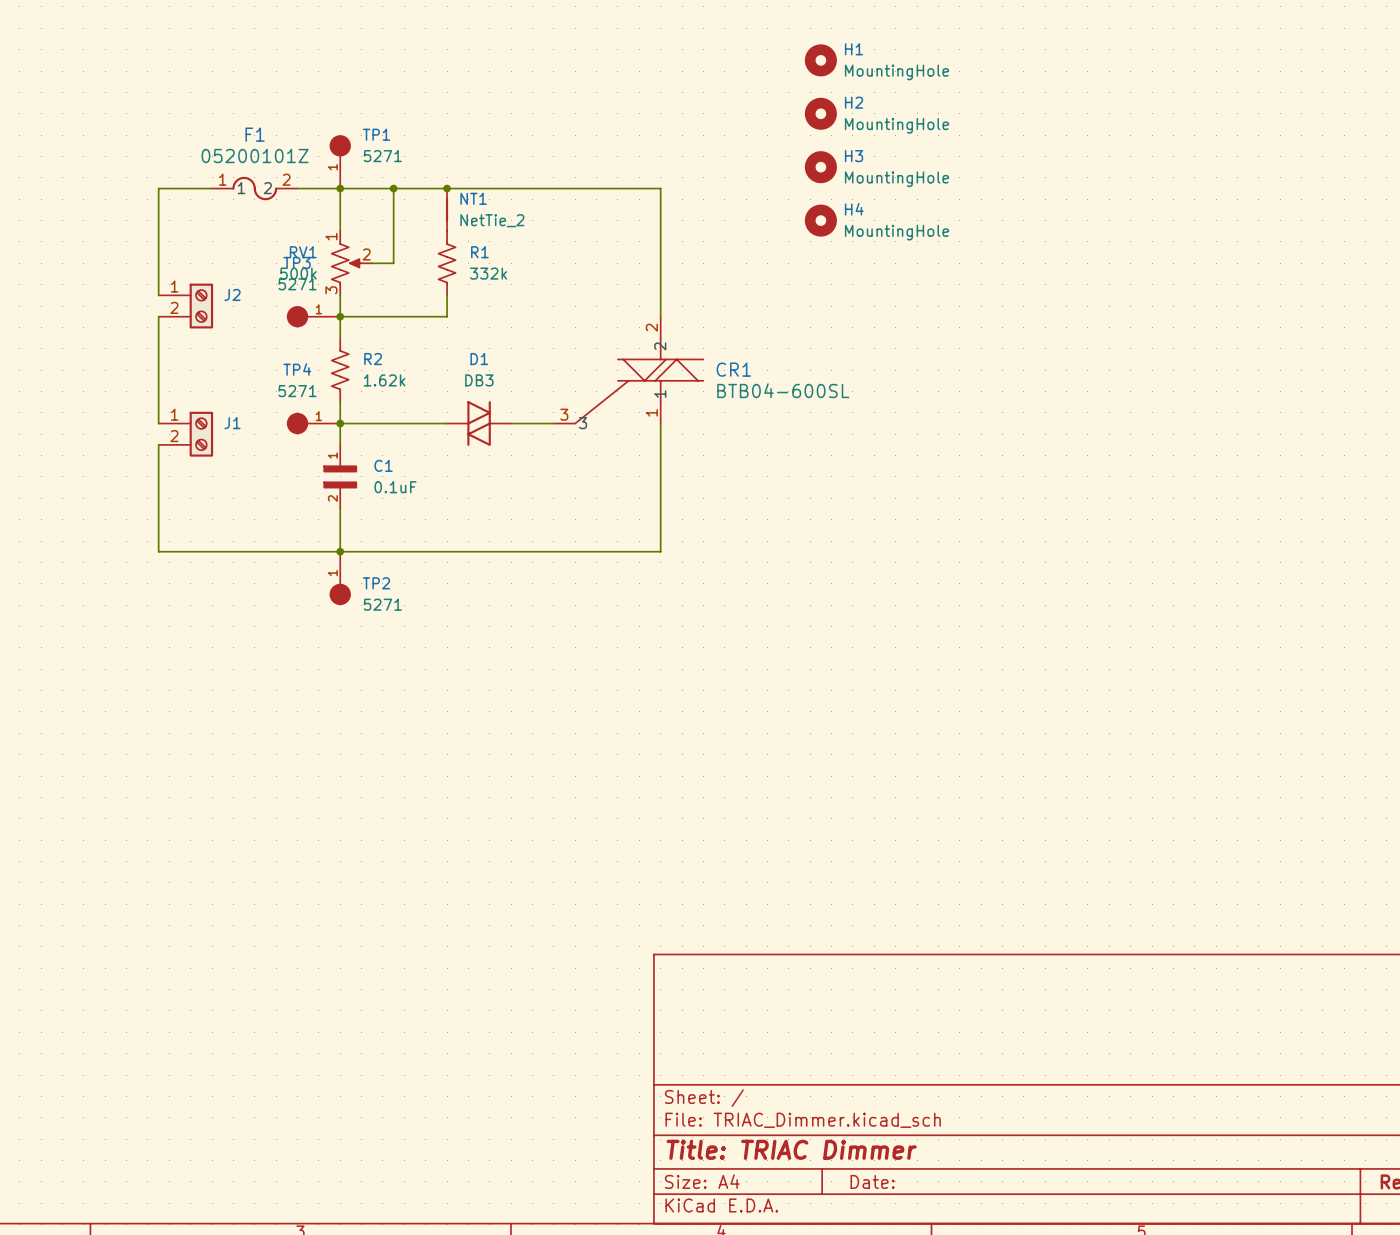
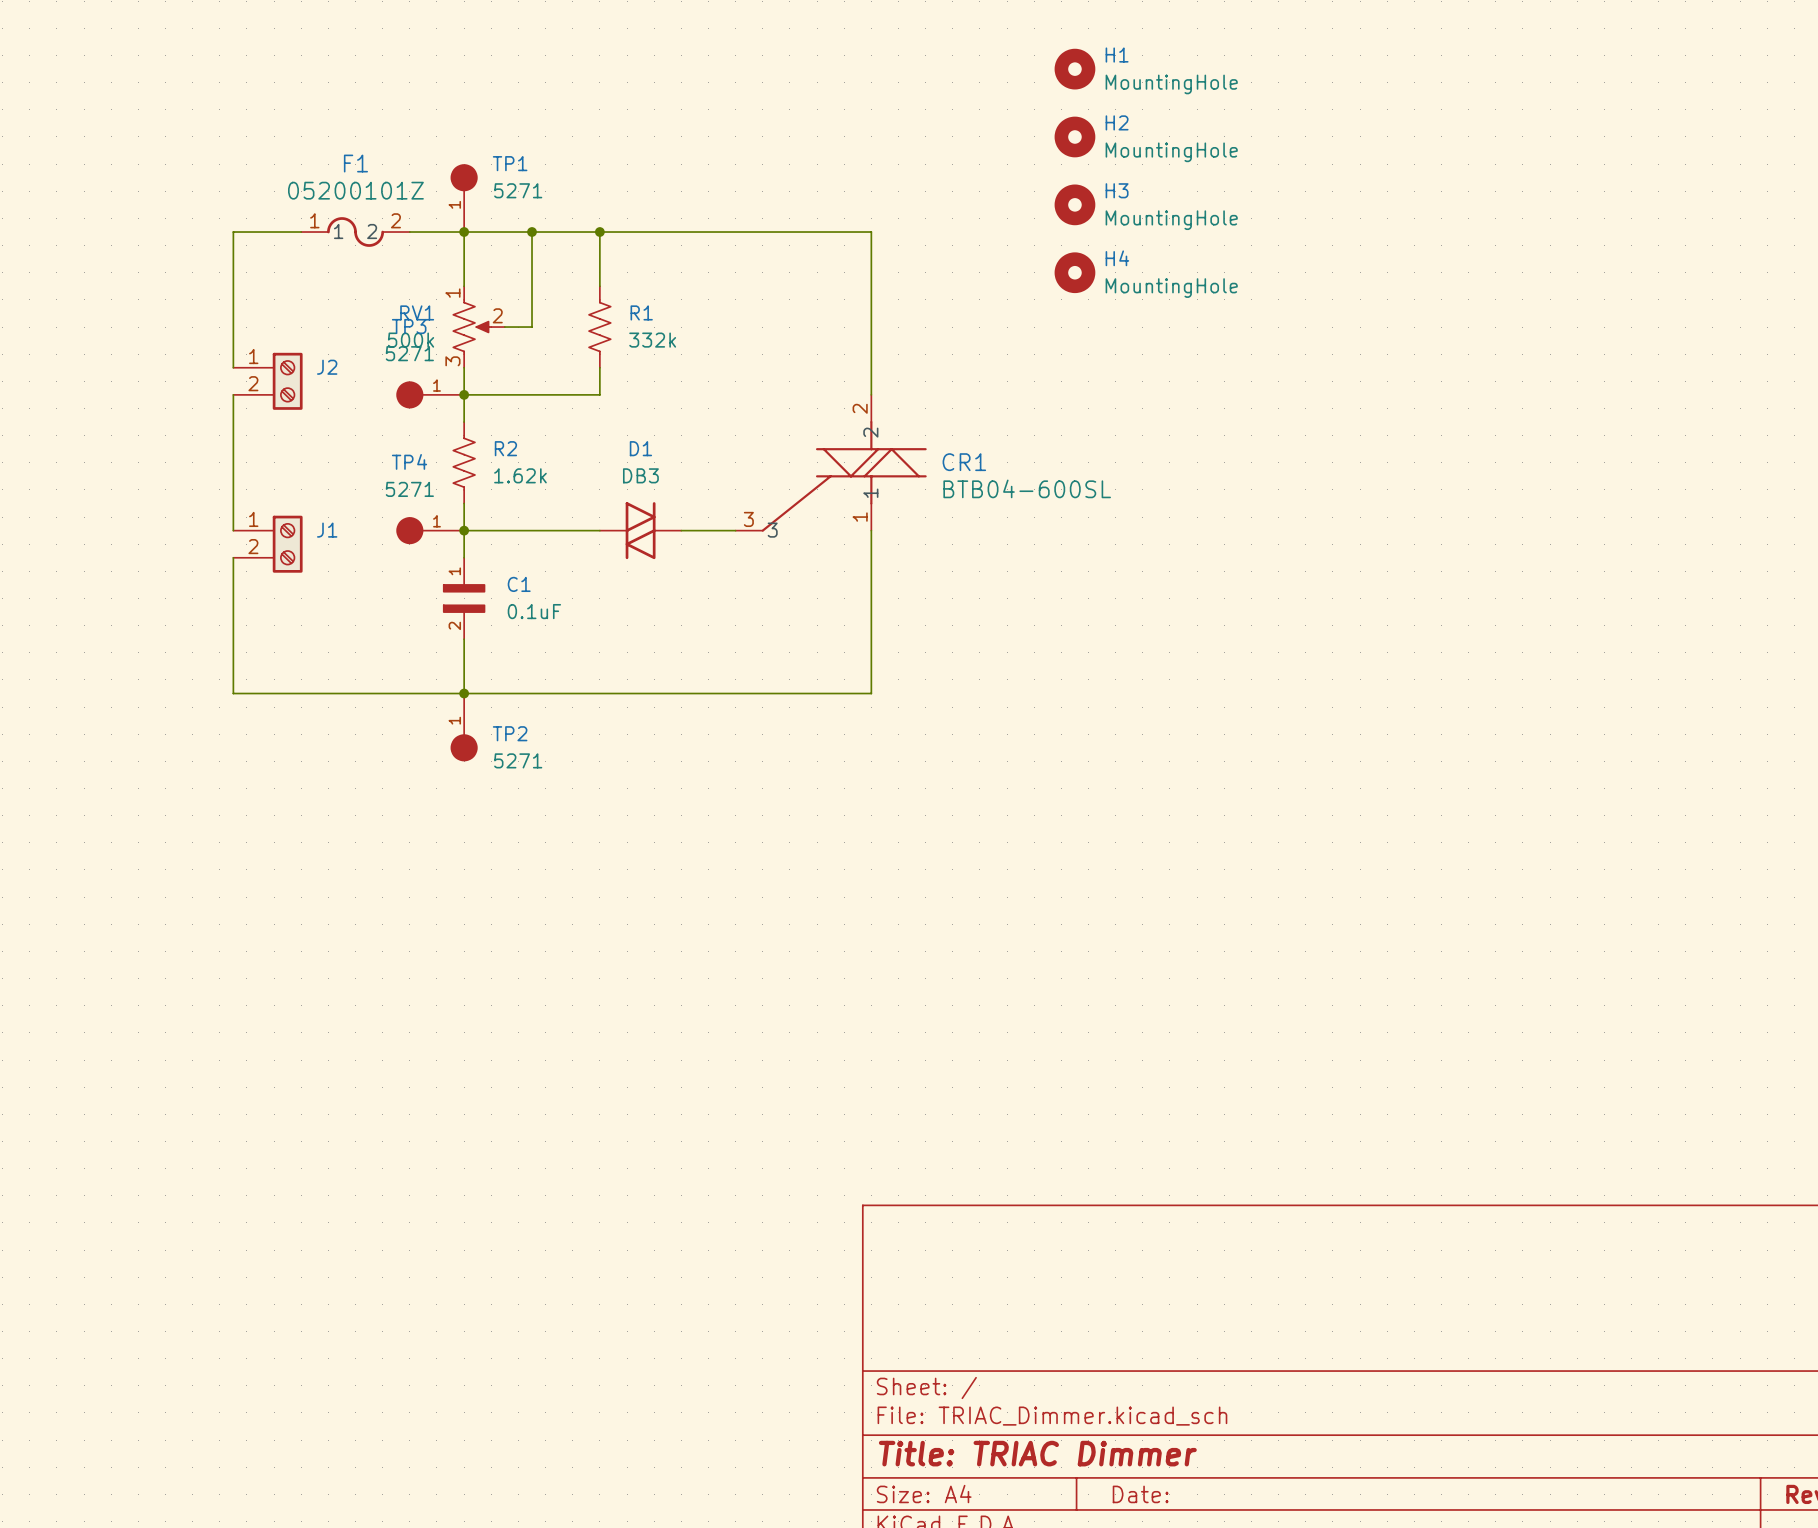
NT1: NetTie_2 (447, 209) -> none

